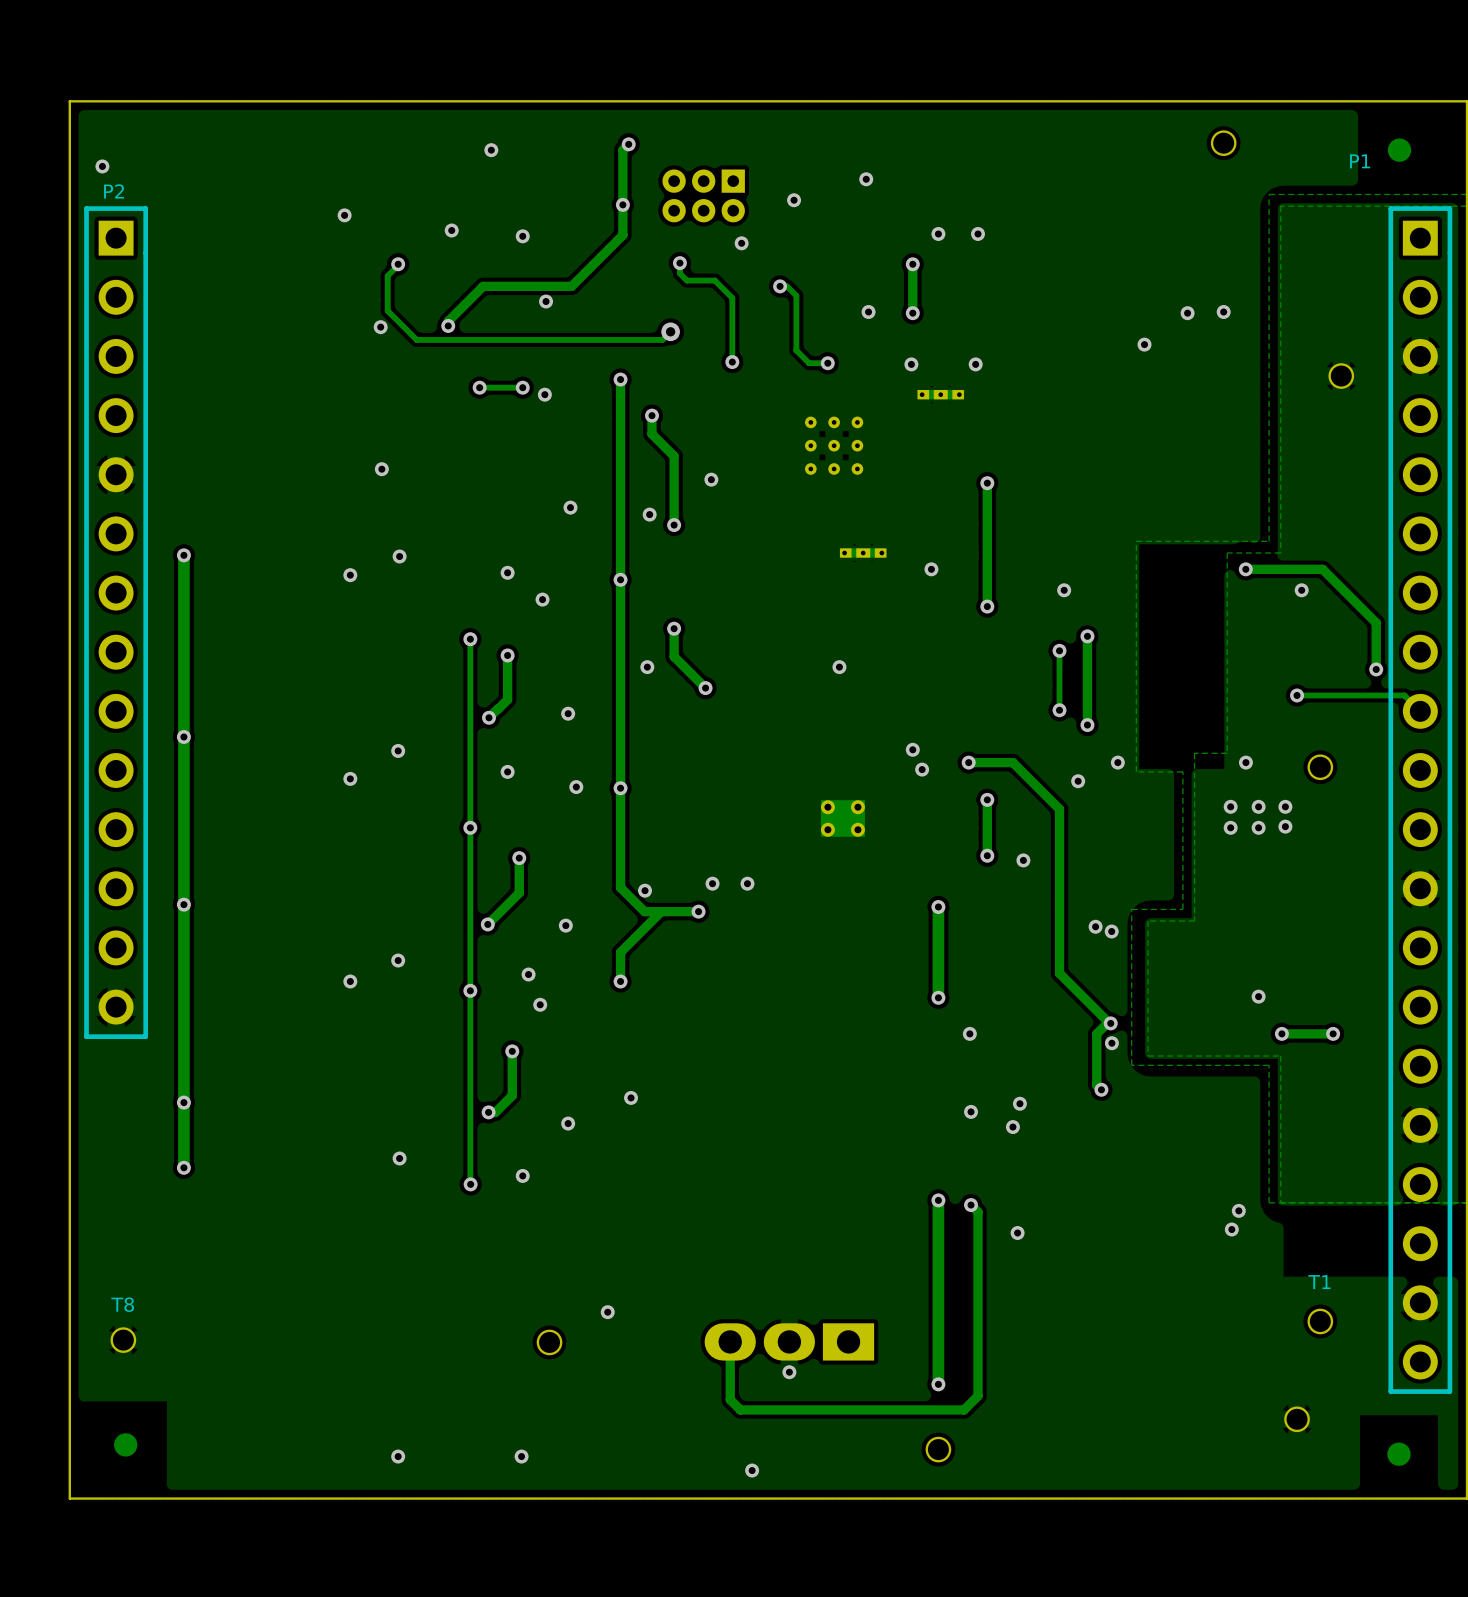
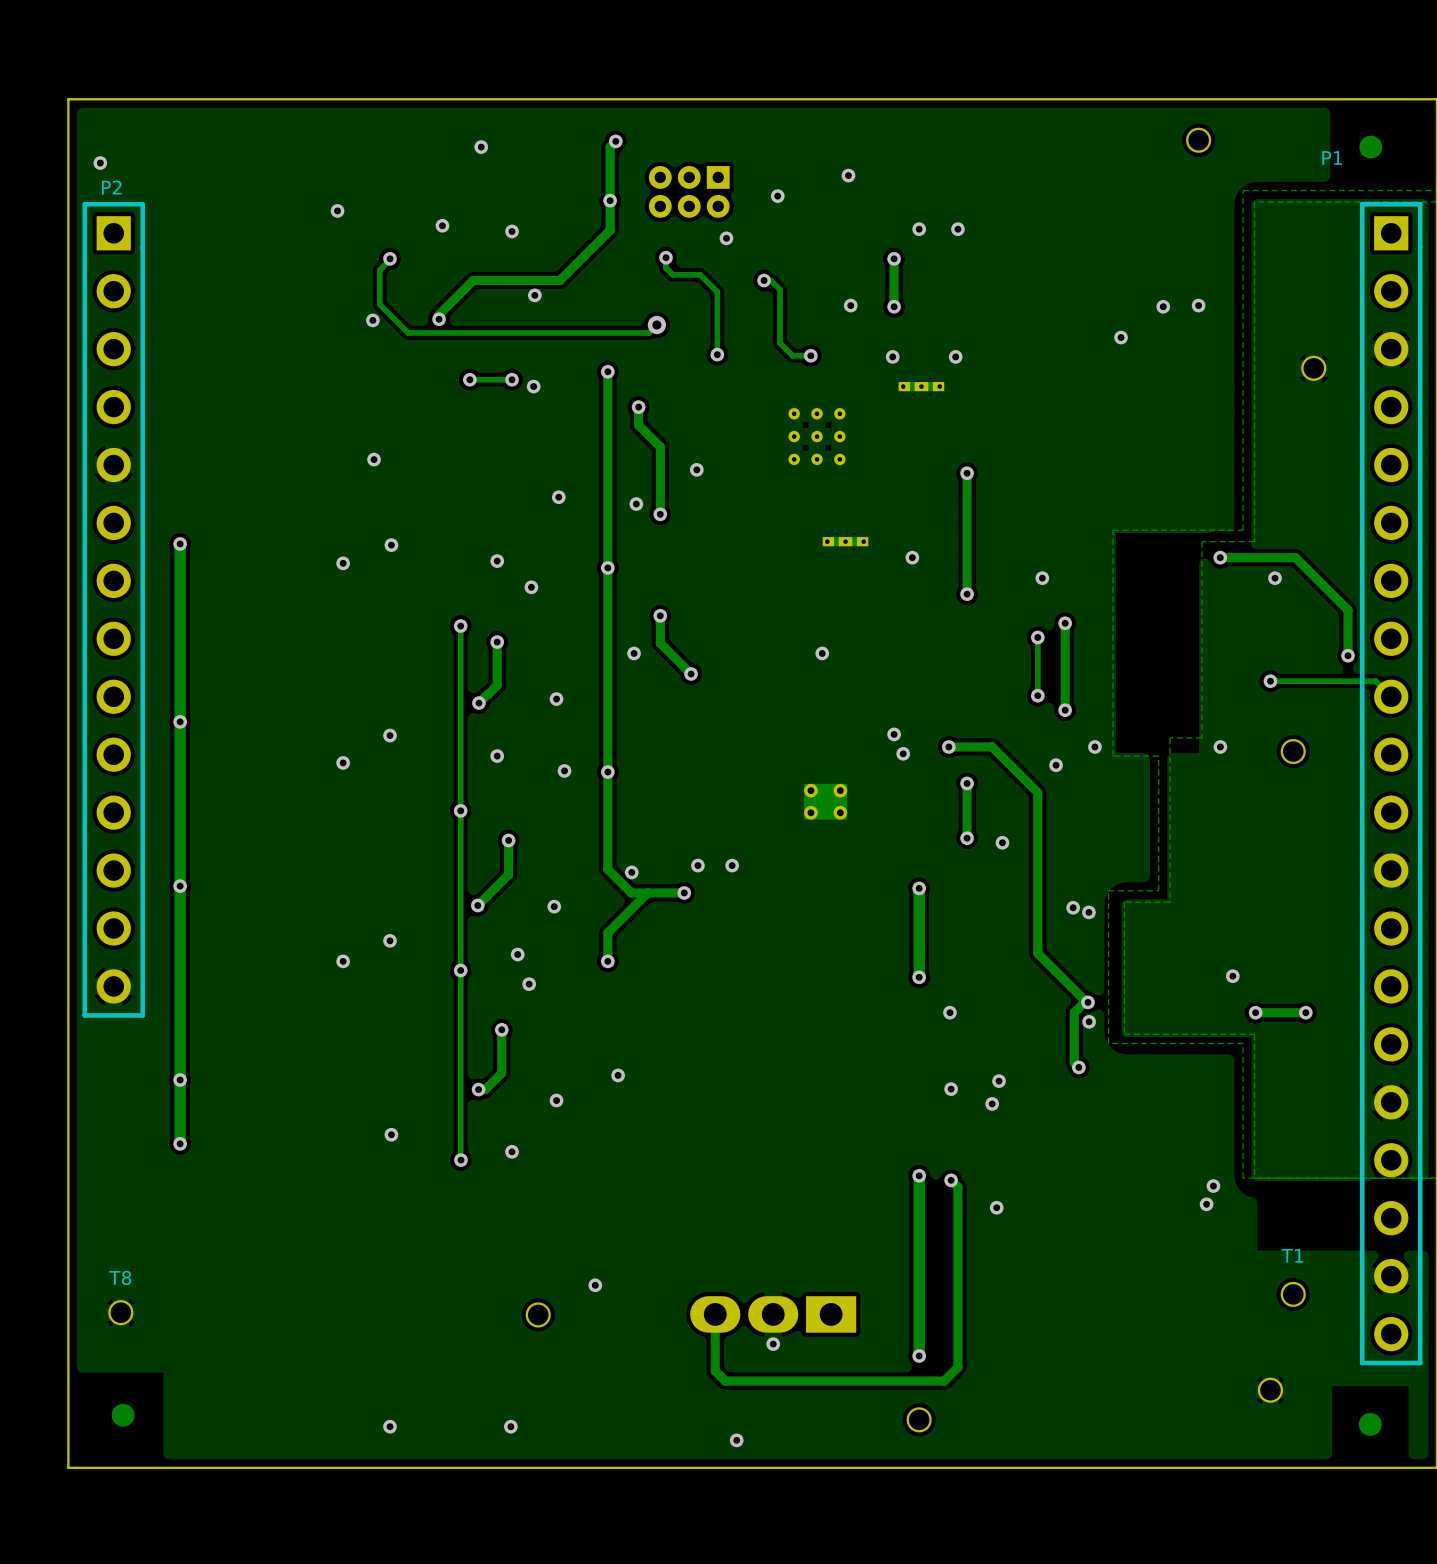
via: (1230, 806) -> none
via: (1258, 806) -> none
via: (1285, 806) -> none
via: (1285, 826) -> none
via: (1230, 827) -> none
via: (1258, 827) -> none

